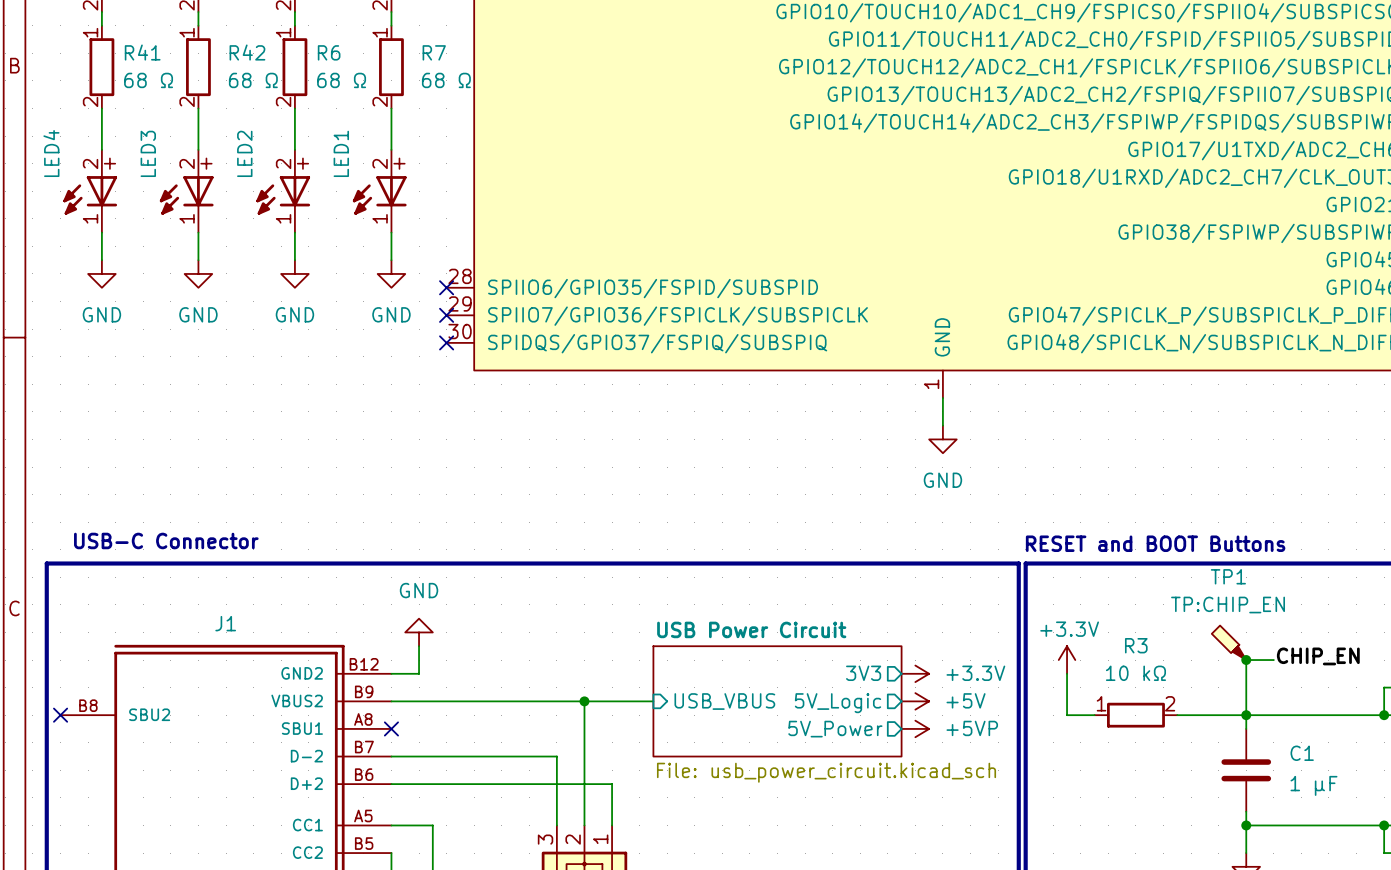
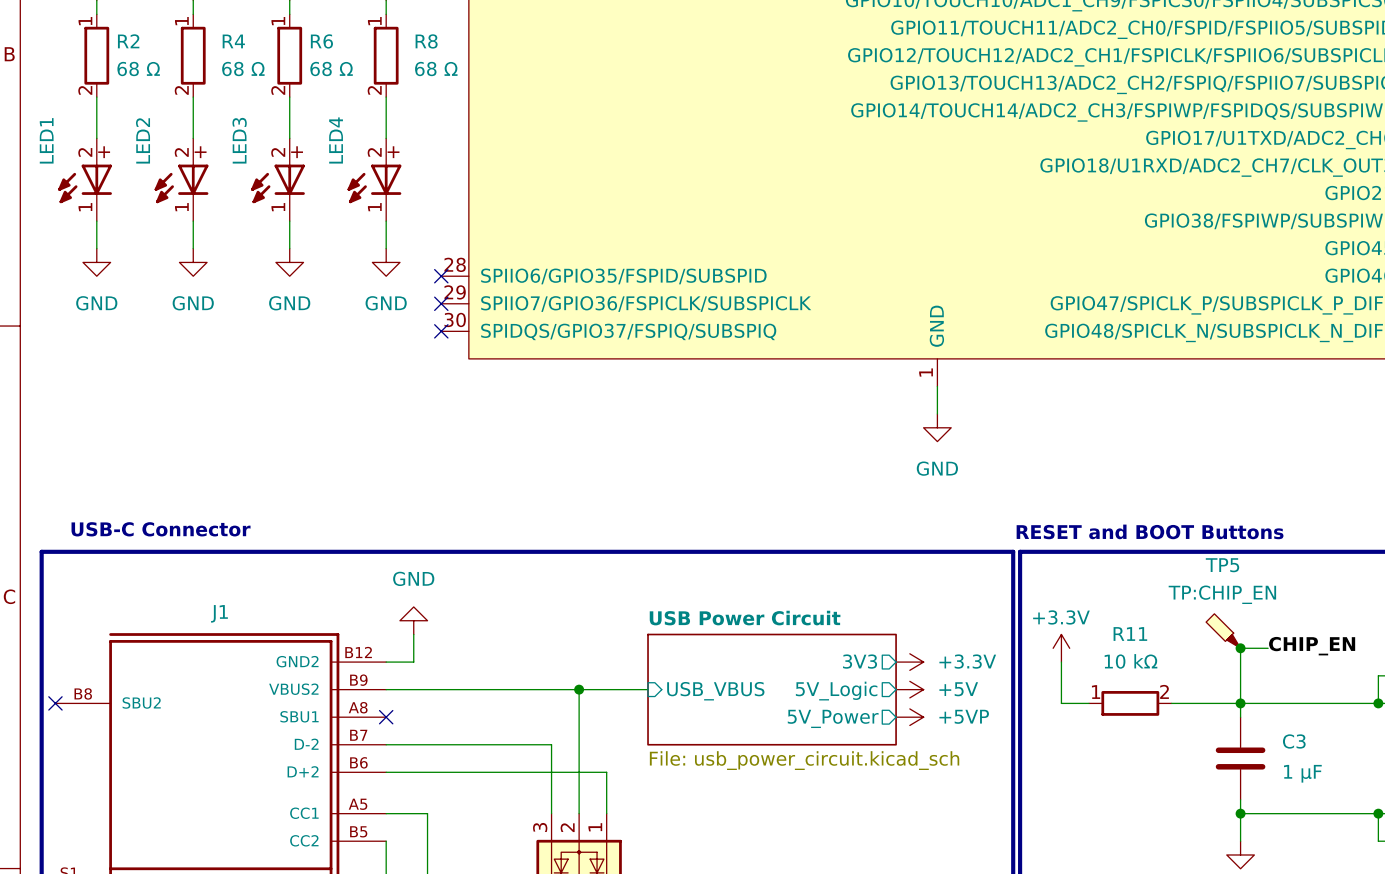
R41 name: R41 (142, 52) -> R2 (128, 41)
R42 name: R42 (247, 52) -> R4 (233, 41)
R7 name: R7 (434, 52) -> R8 (426, 41)
LED4 name: LED4 (51, 153) -> LED1 (46, 140)
LED3 name: LED3 (148, 153) -> LED2 (143, 140)
LED2 name: LED2 (244, 153) -> LED3 (239, 140)
LED1 name: LED1 (341, 153) -> LED4 (336, 140)
TP1 name: TP1 (1228, 576) -> TP5 (1222, 565)
R3 name: R3 (1136, 645) -> R11 (1130, 633)
C1 name: C1 (1302, 753) -> C3 (1294, 741)

